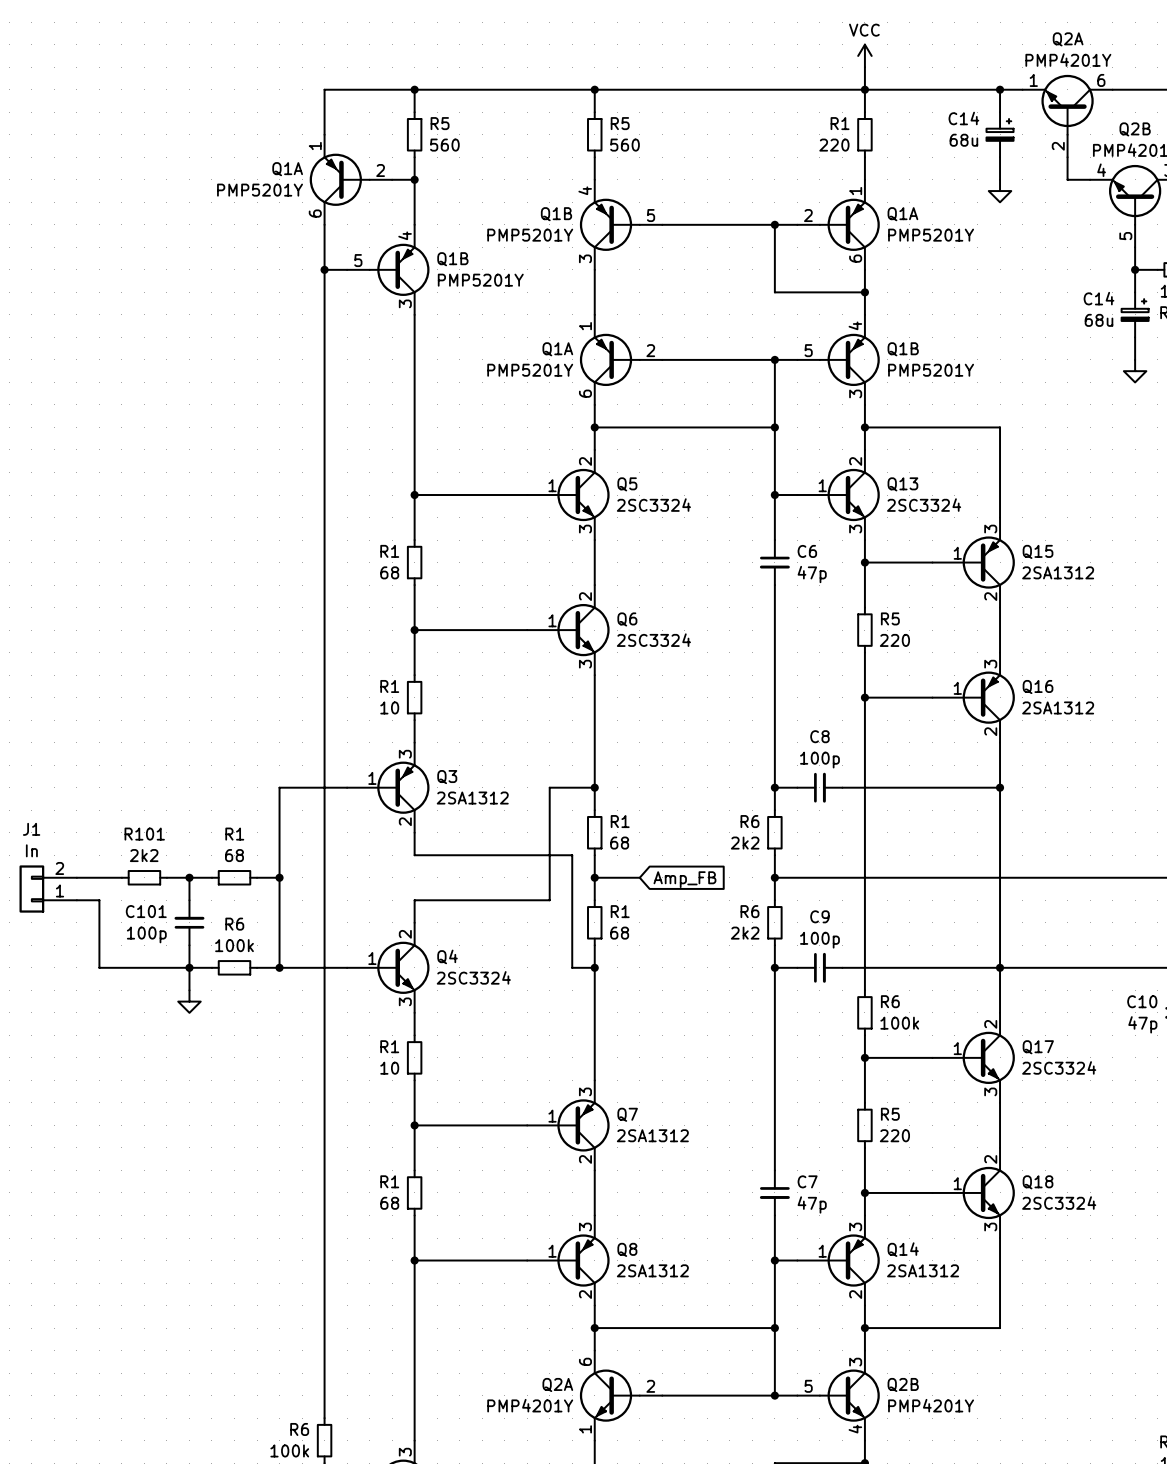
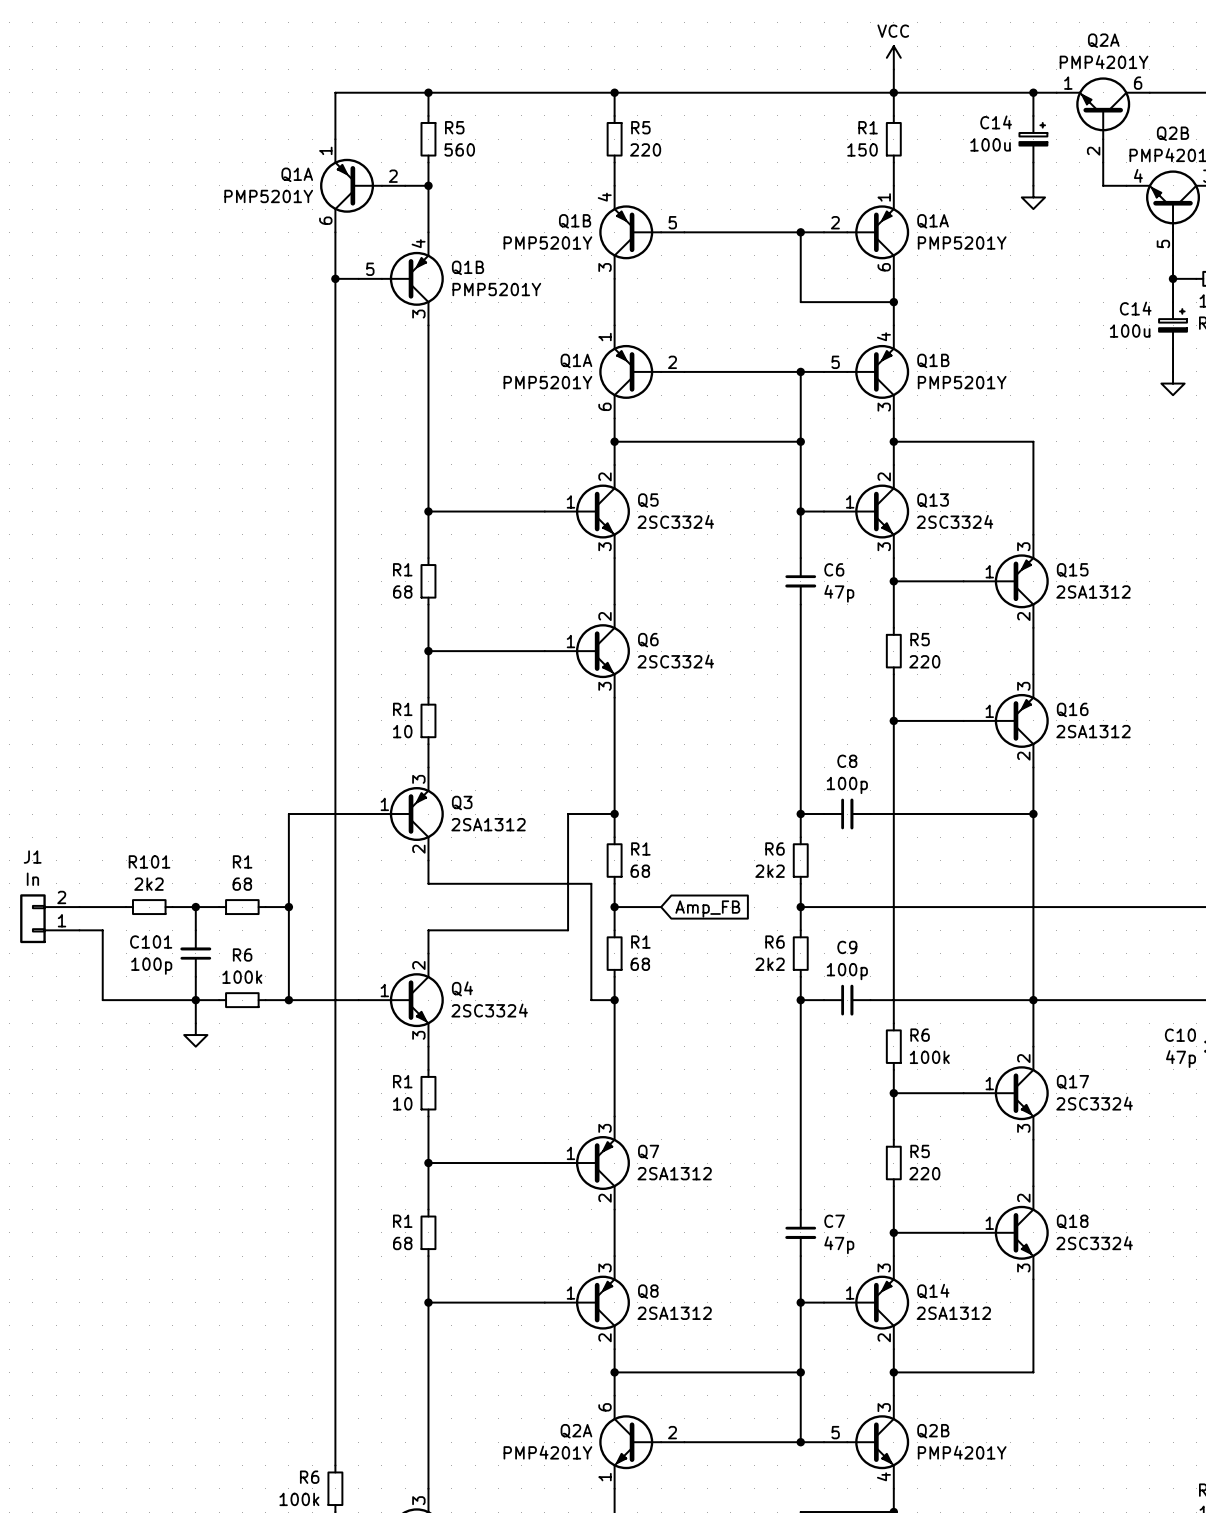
C14 value: 68u (963, 140) -> 100u (990, 144)
R5 value: 560 (625, 145) -> 220 (645, 149)
R1 value: 220 (834, 145) -> 150 (862, 149)
C14 value: 68u (1099, 320) -> 100u (1130, 331)

